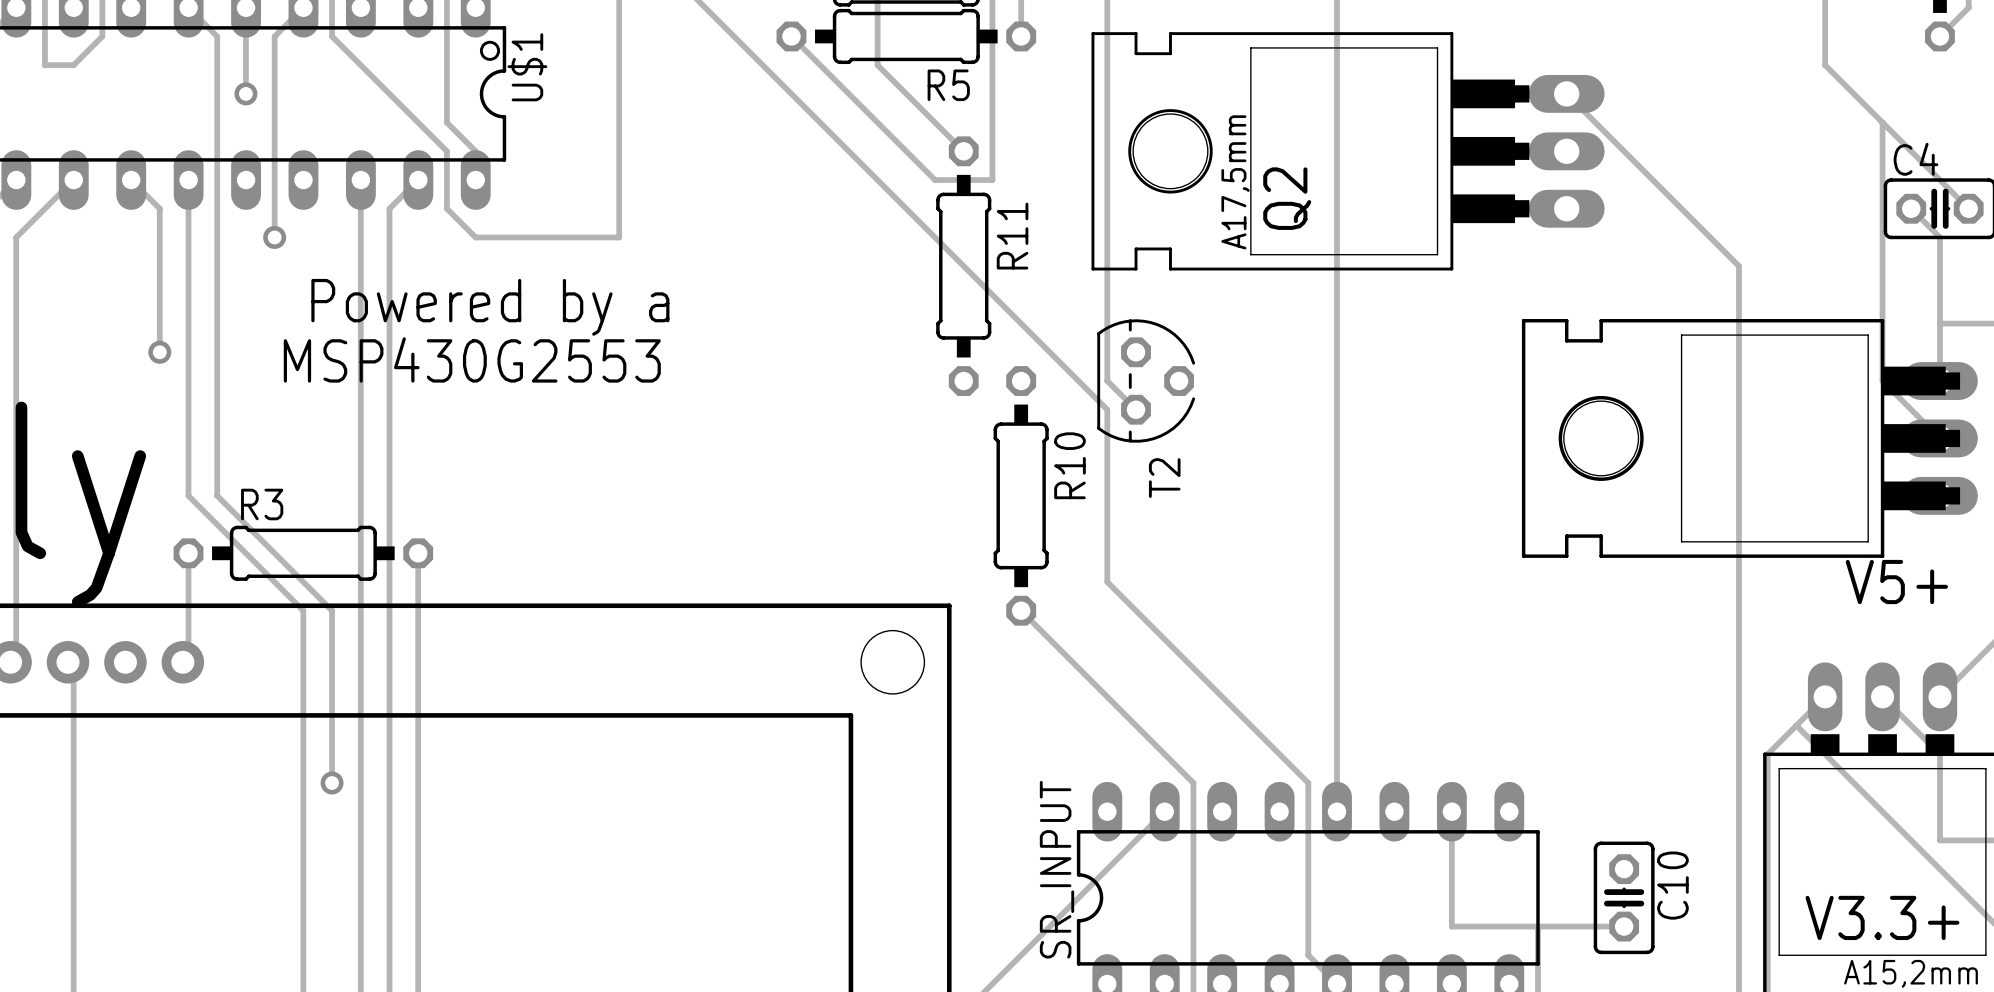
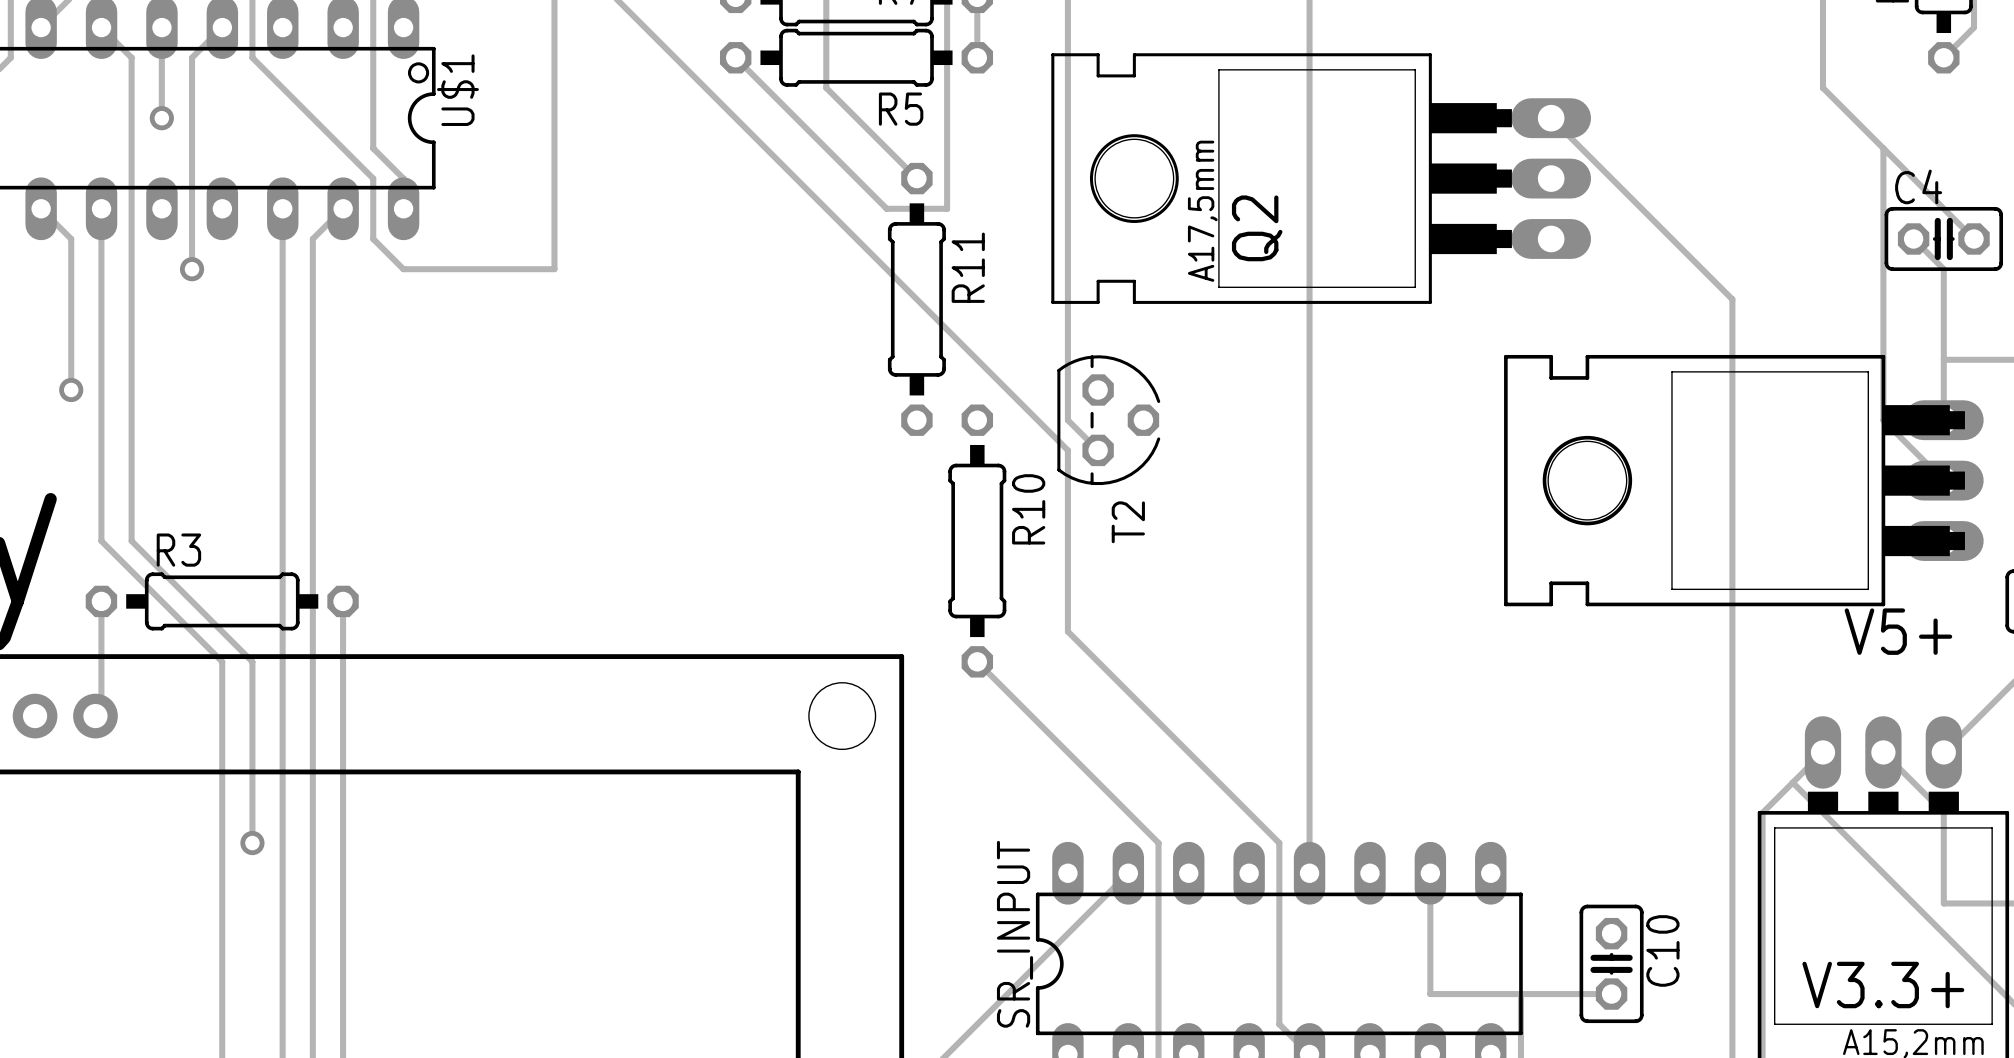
text: Powered by a (490, 307) -> none
text: MSP430G2553 (472, 359) -> none

